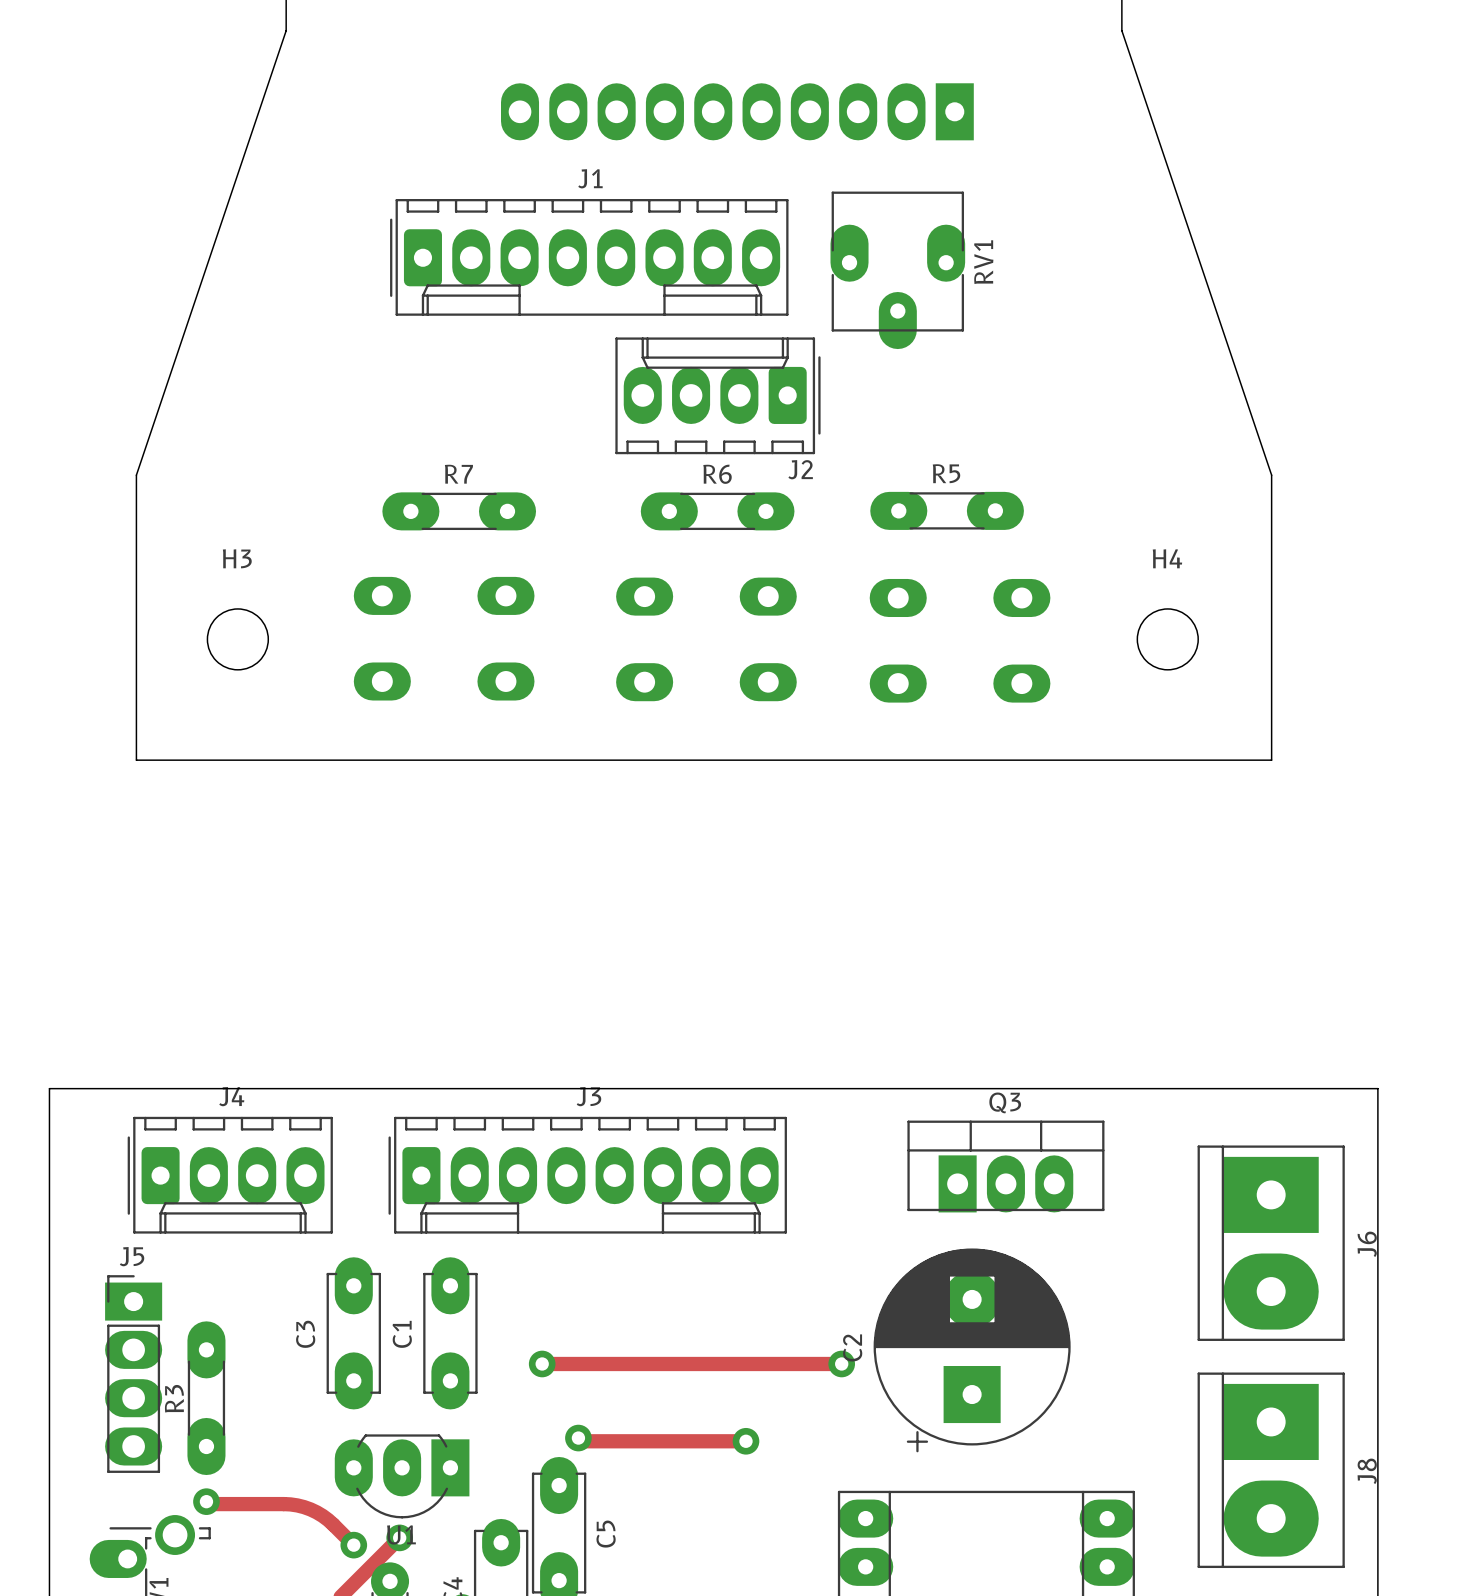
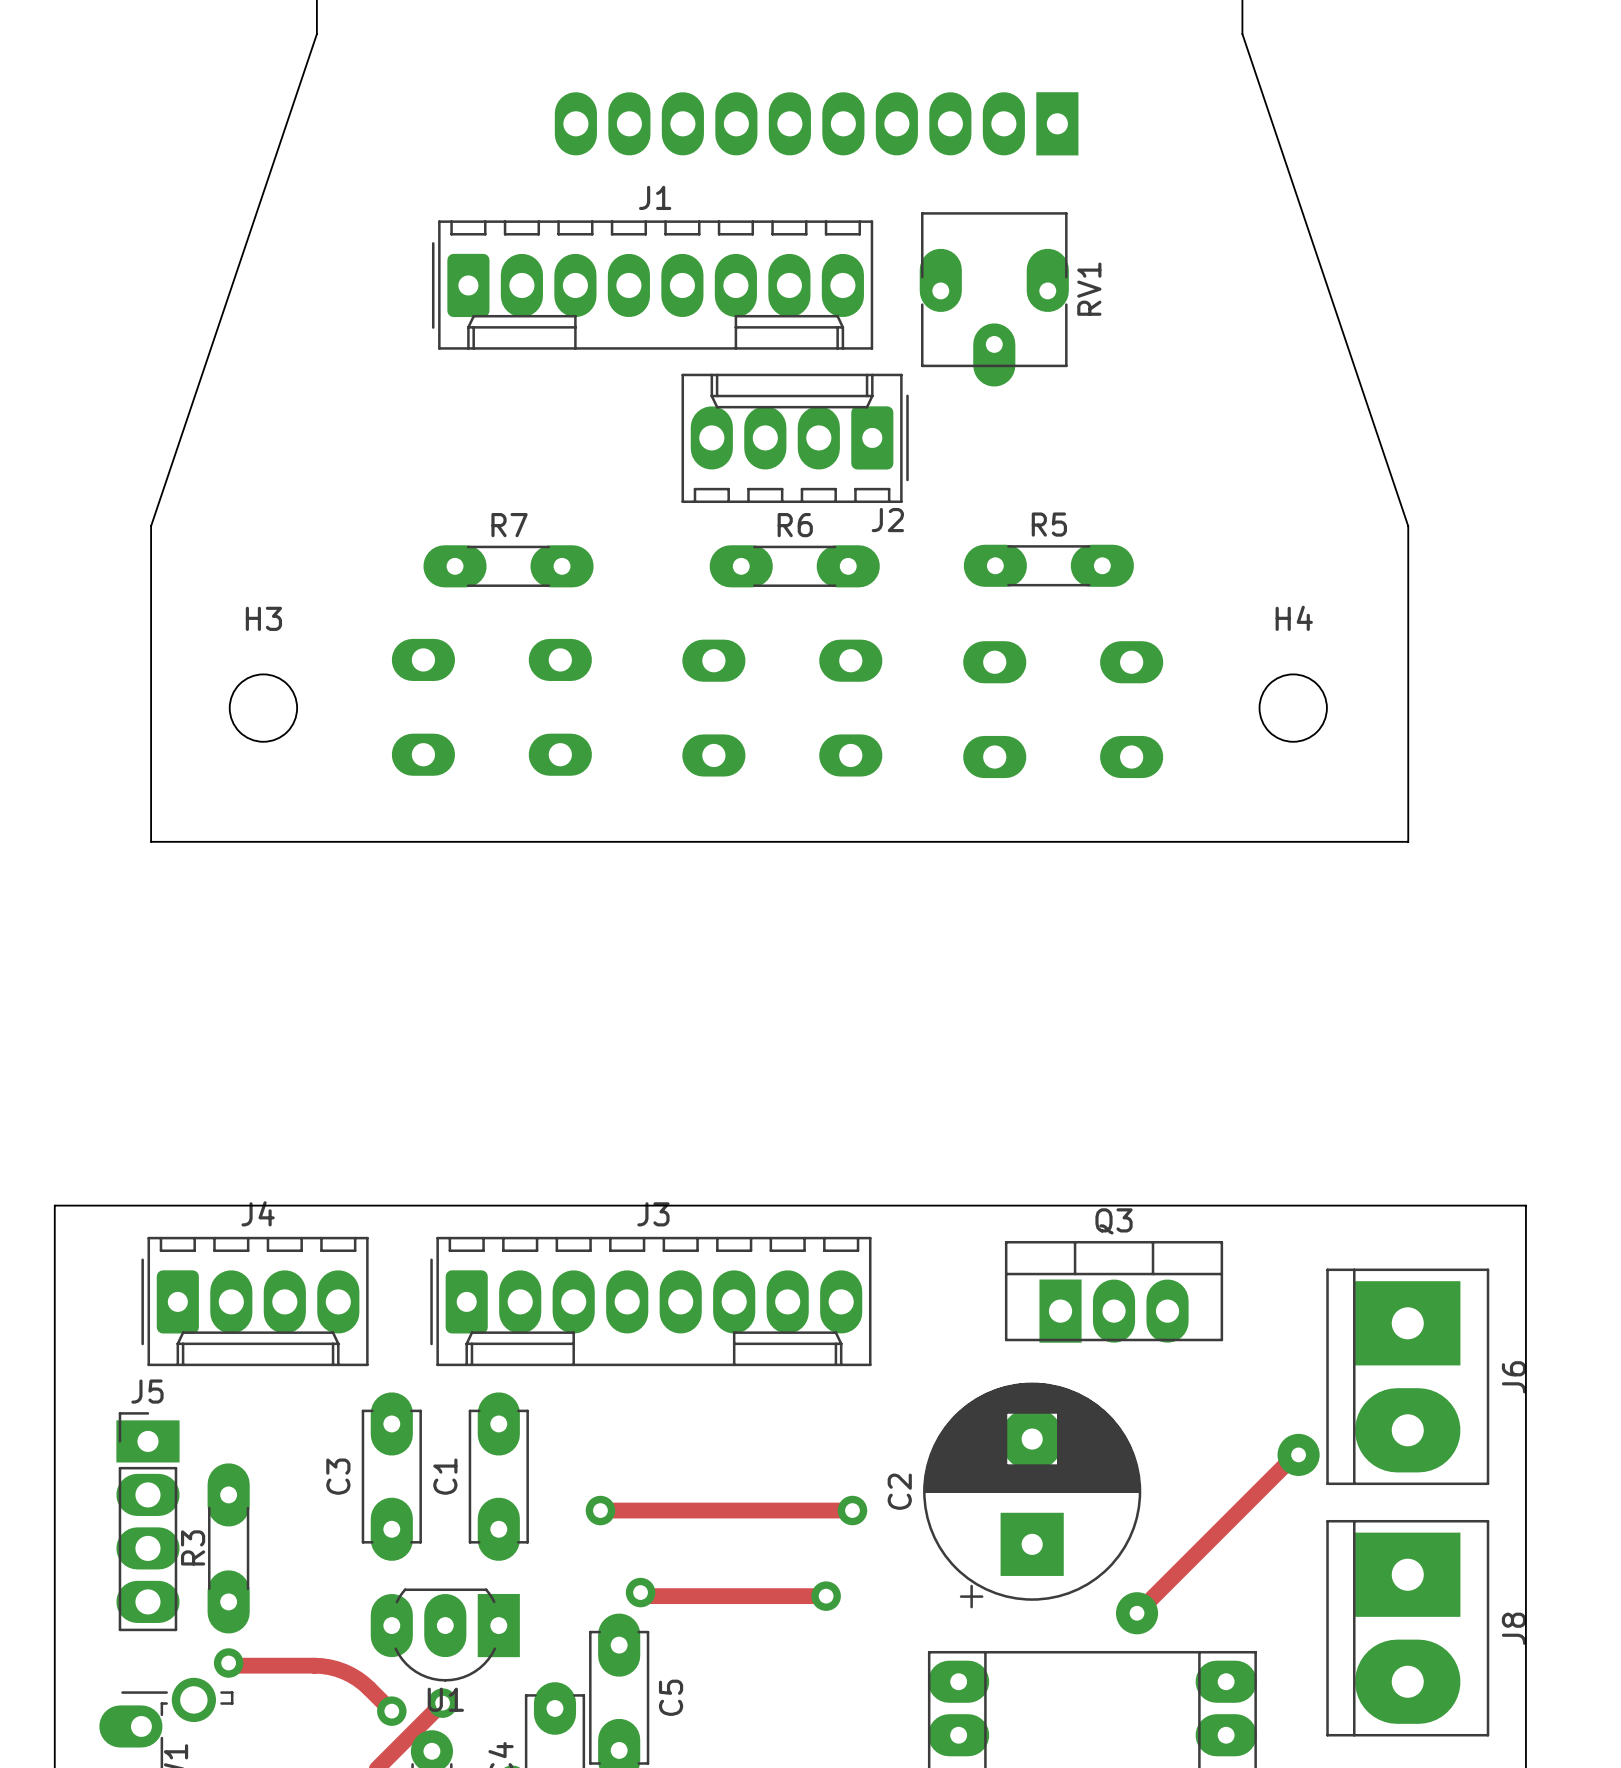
track: none -> (1298, 1454) (1294, 1456) (1137, 1613)
via: none -> (1298, 1454)
C2 position: (972, 1350) -> (1032, 1495)
track: (769, 1363) (841, 1363) -> none
via position: (841, 1363) -> (852, 1510)
via: none -> (1137, 1613)

